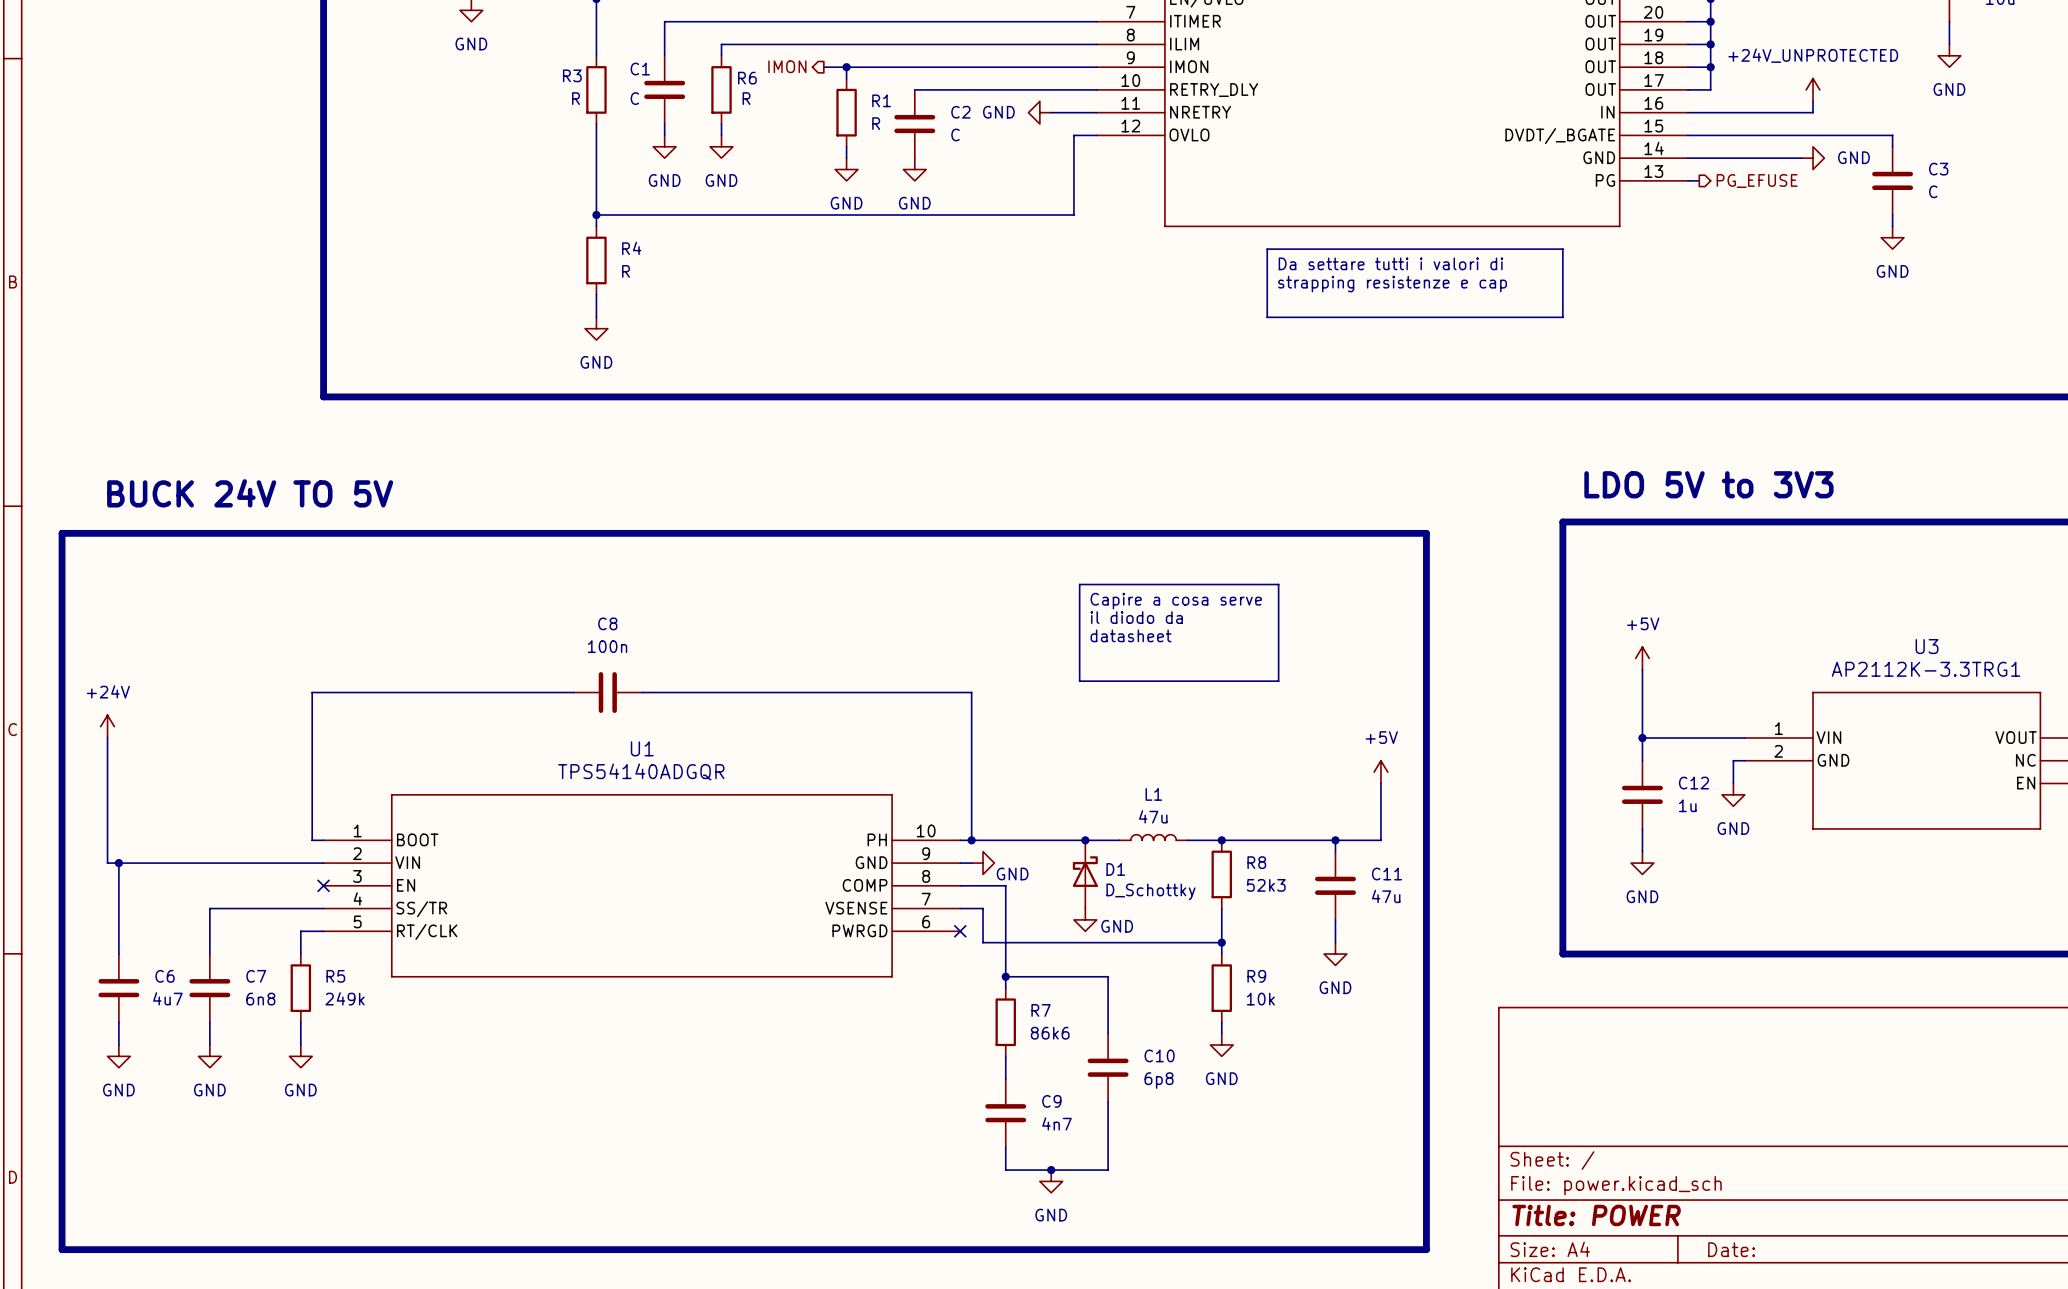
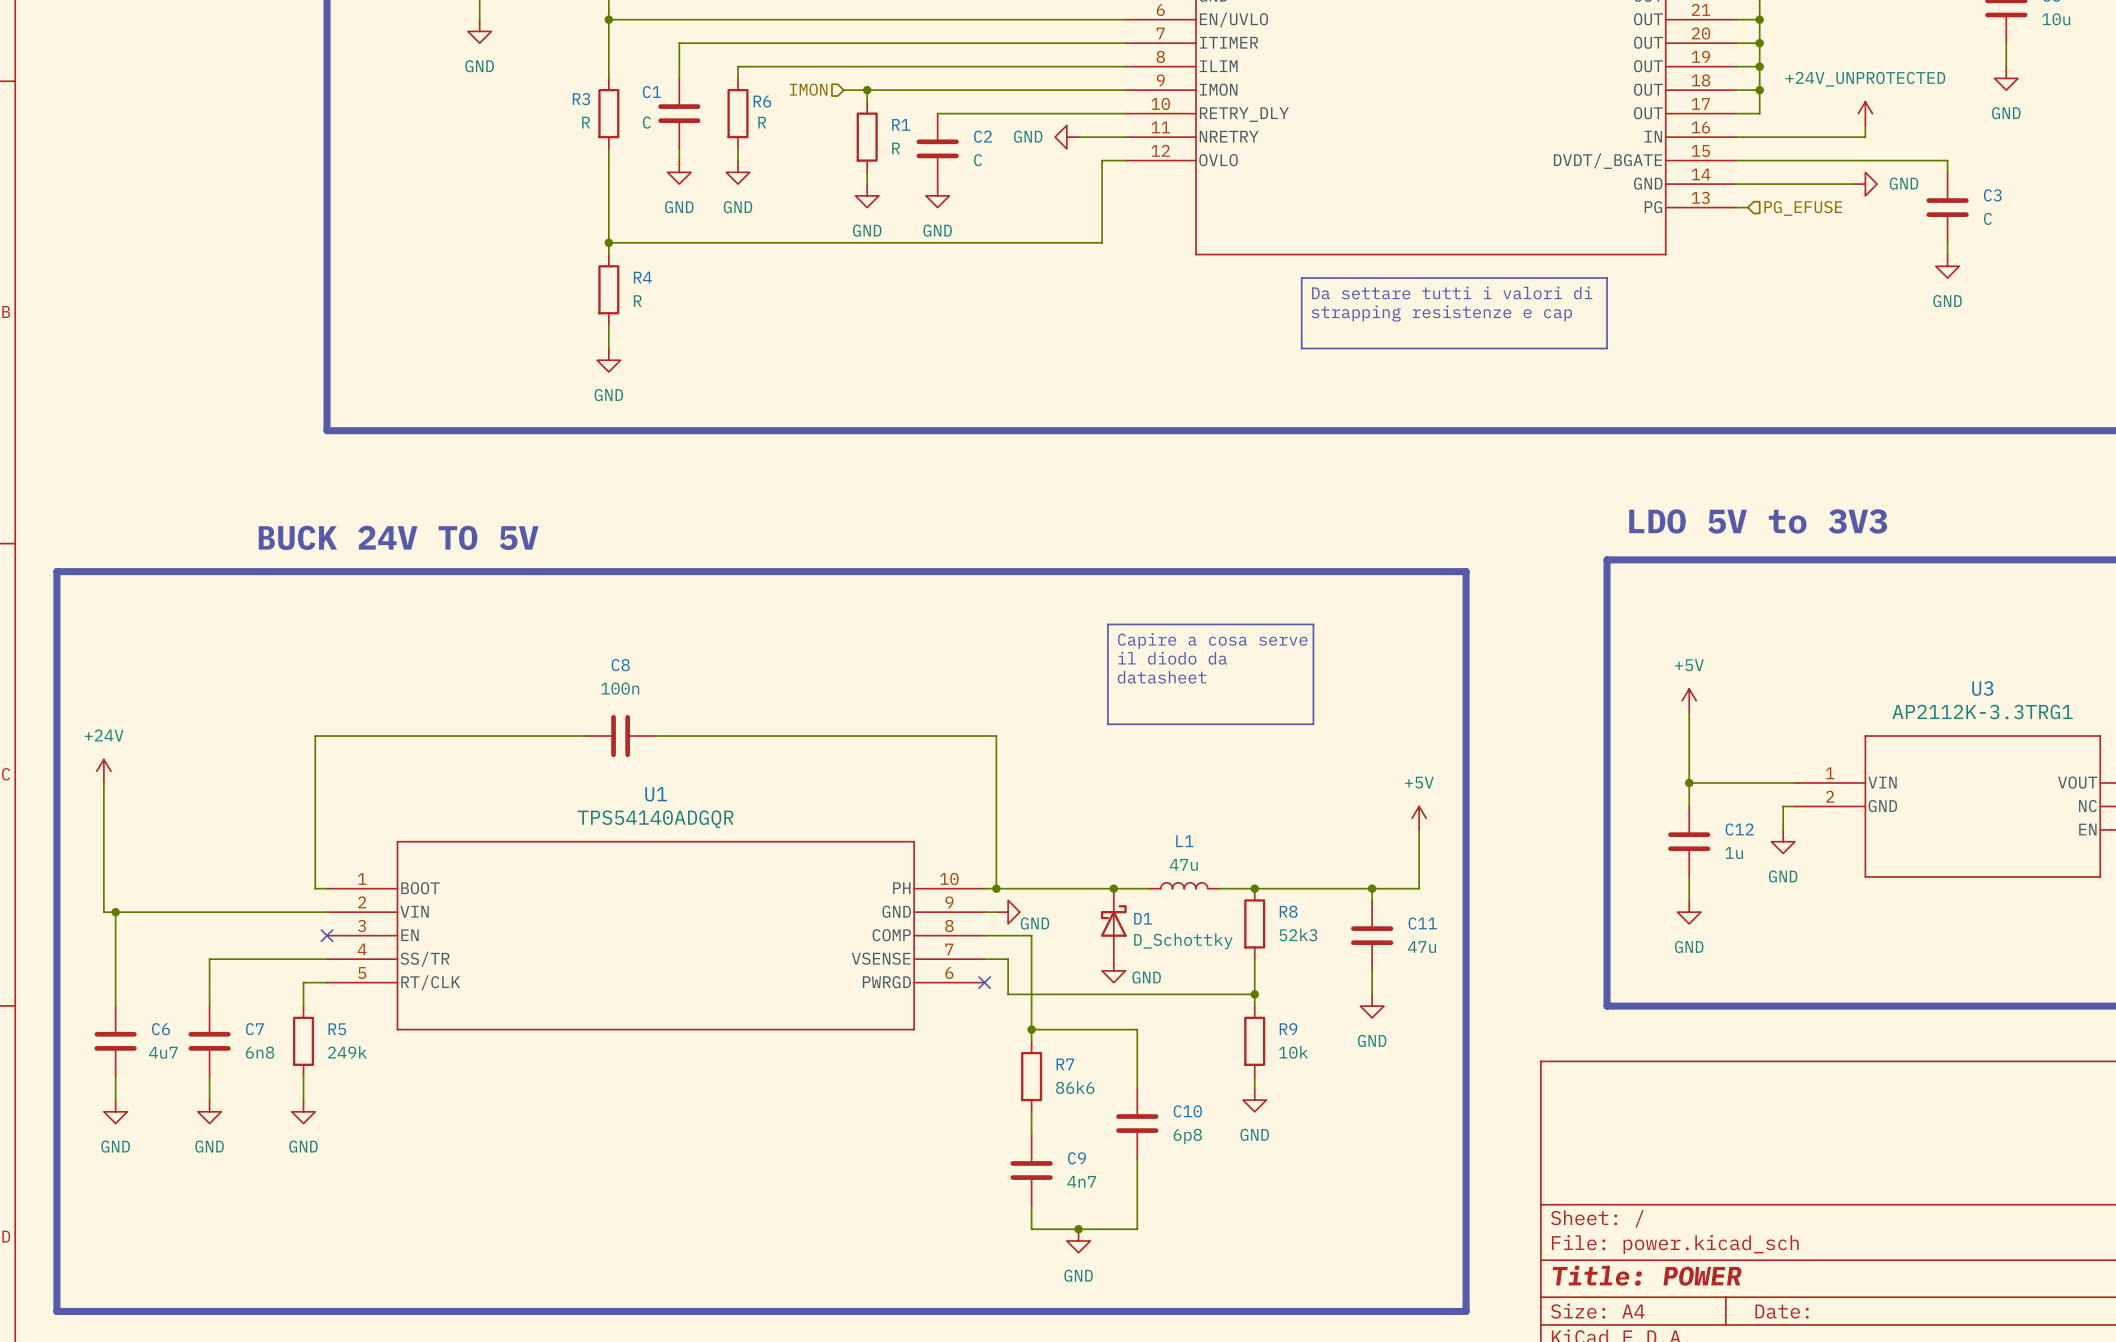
hierarchical label shape: output (787, 66) -> input (808, 89)
hierarchical label shape: output (1757, 181) -> input (1803, 208)
text position: BUCK 24V TO 5V (250, 493) -> BUCK 24V TO 5V (398, 537)

